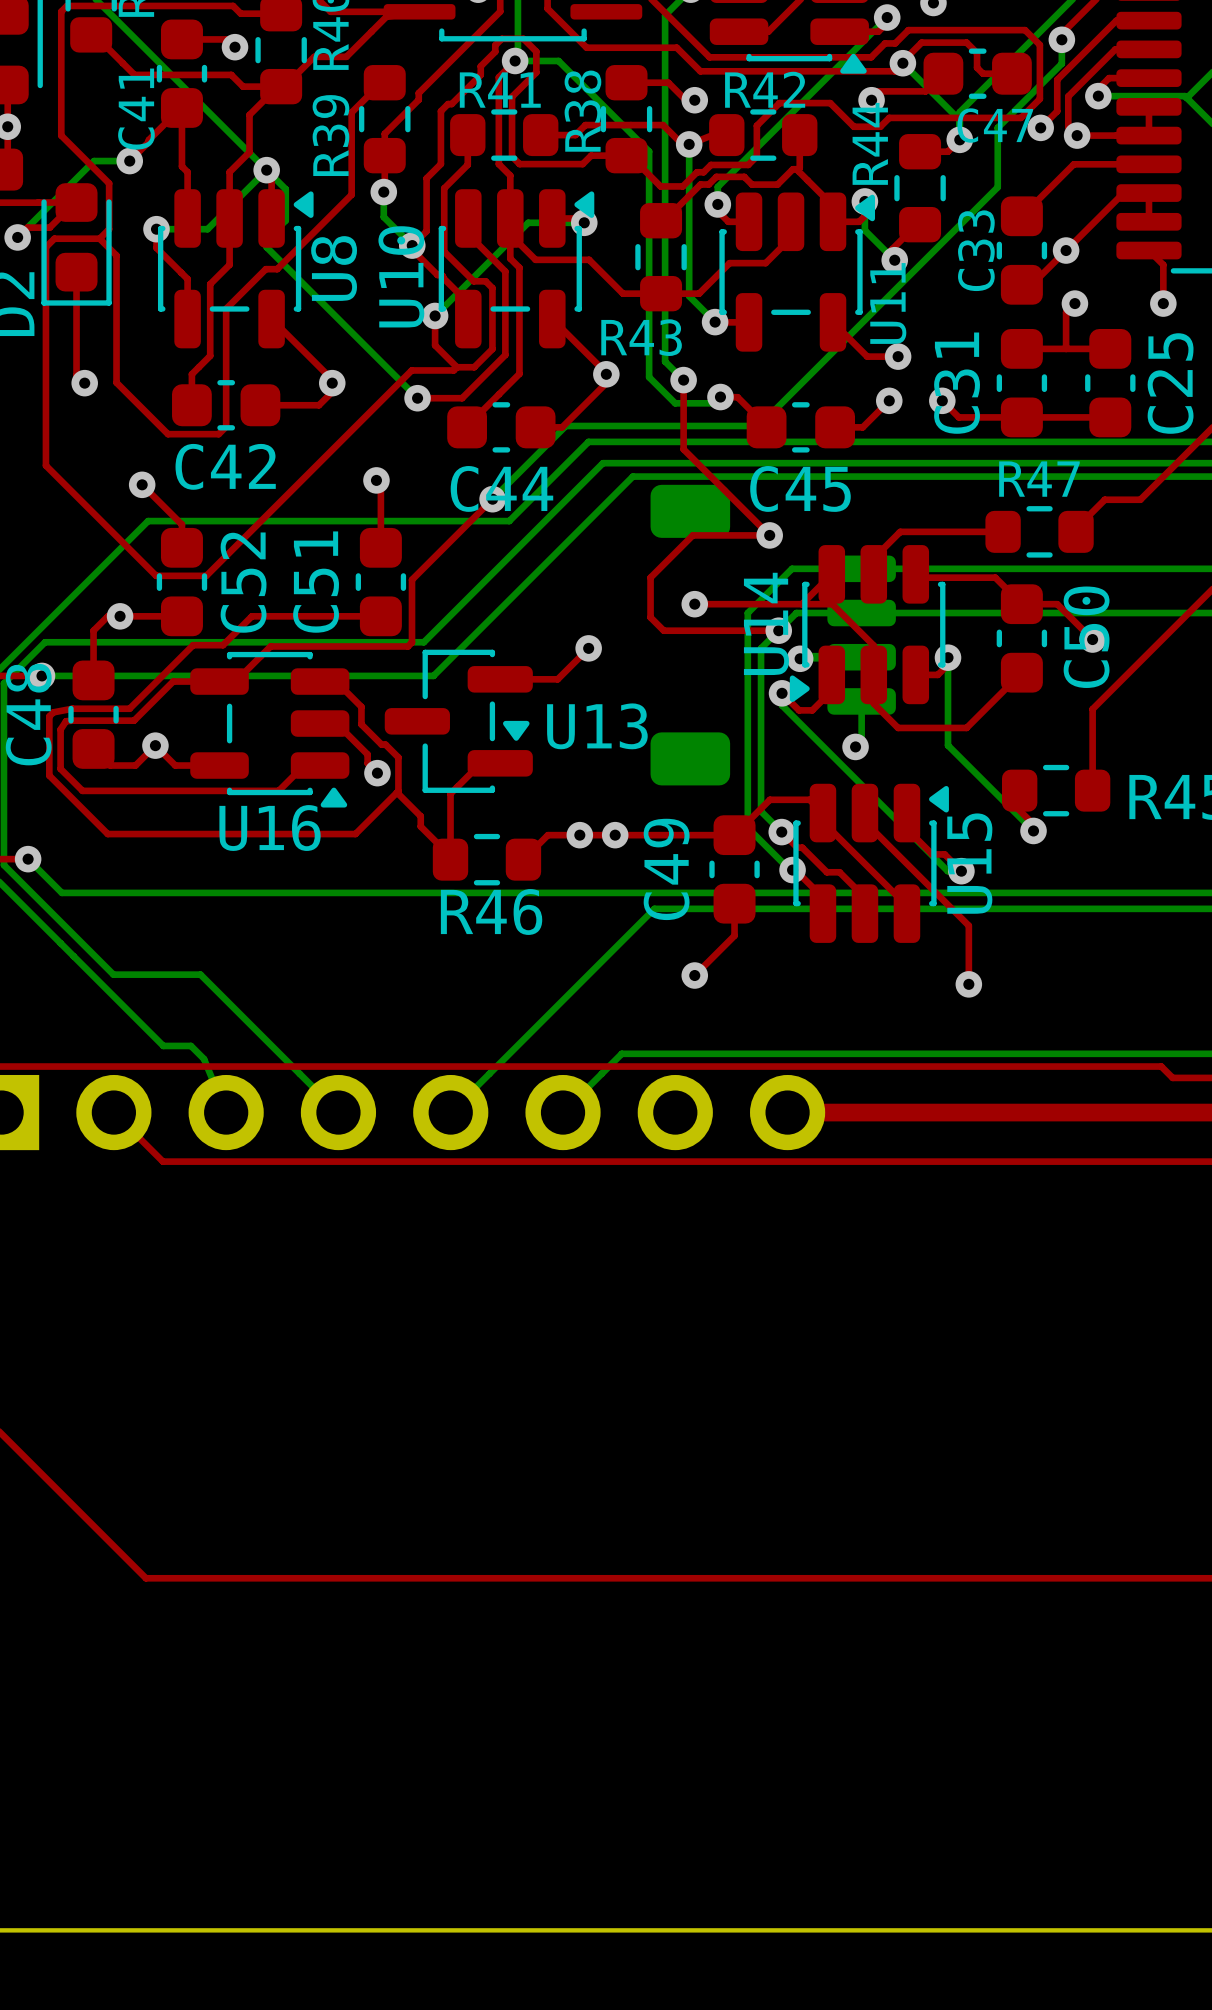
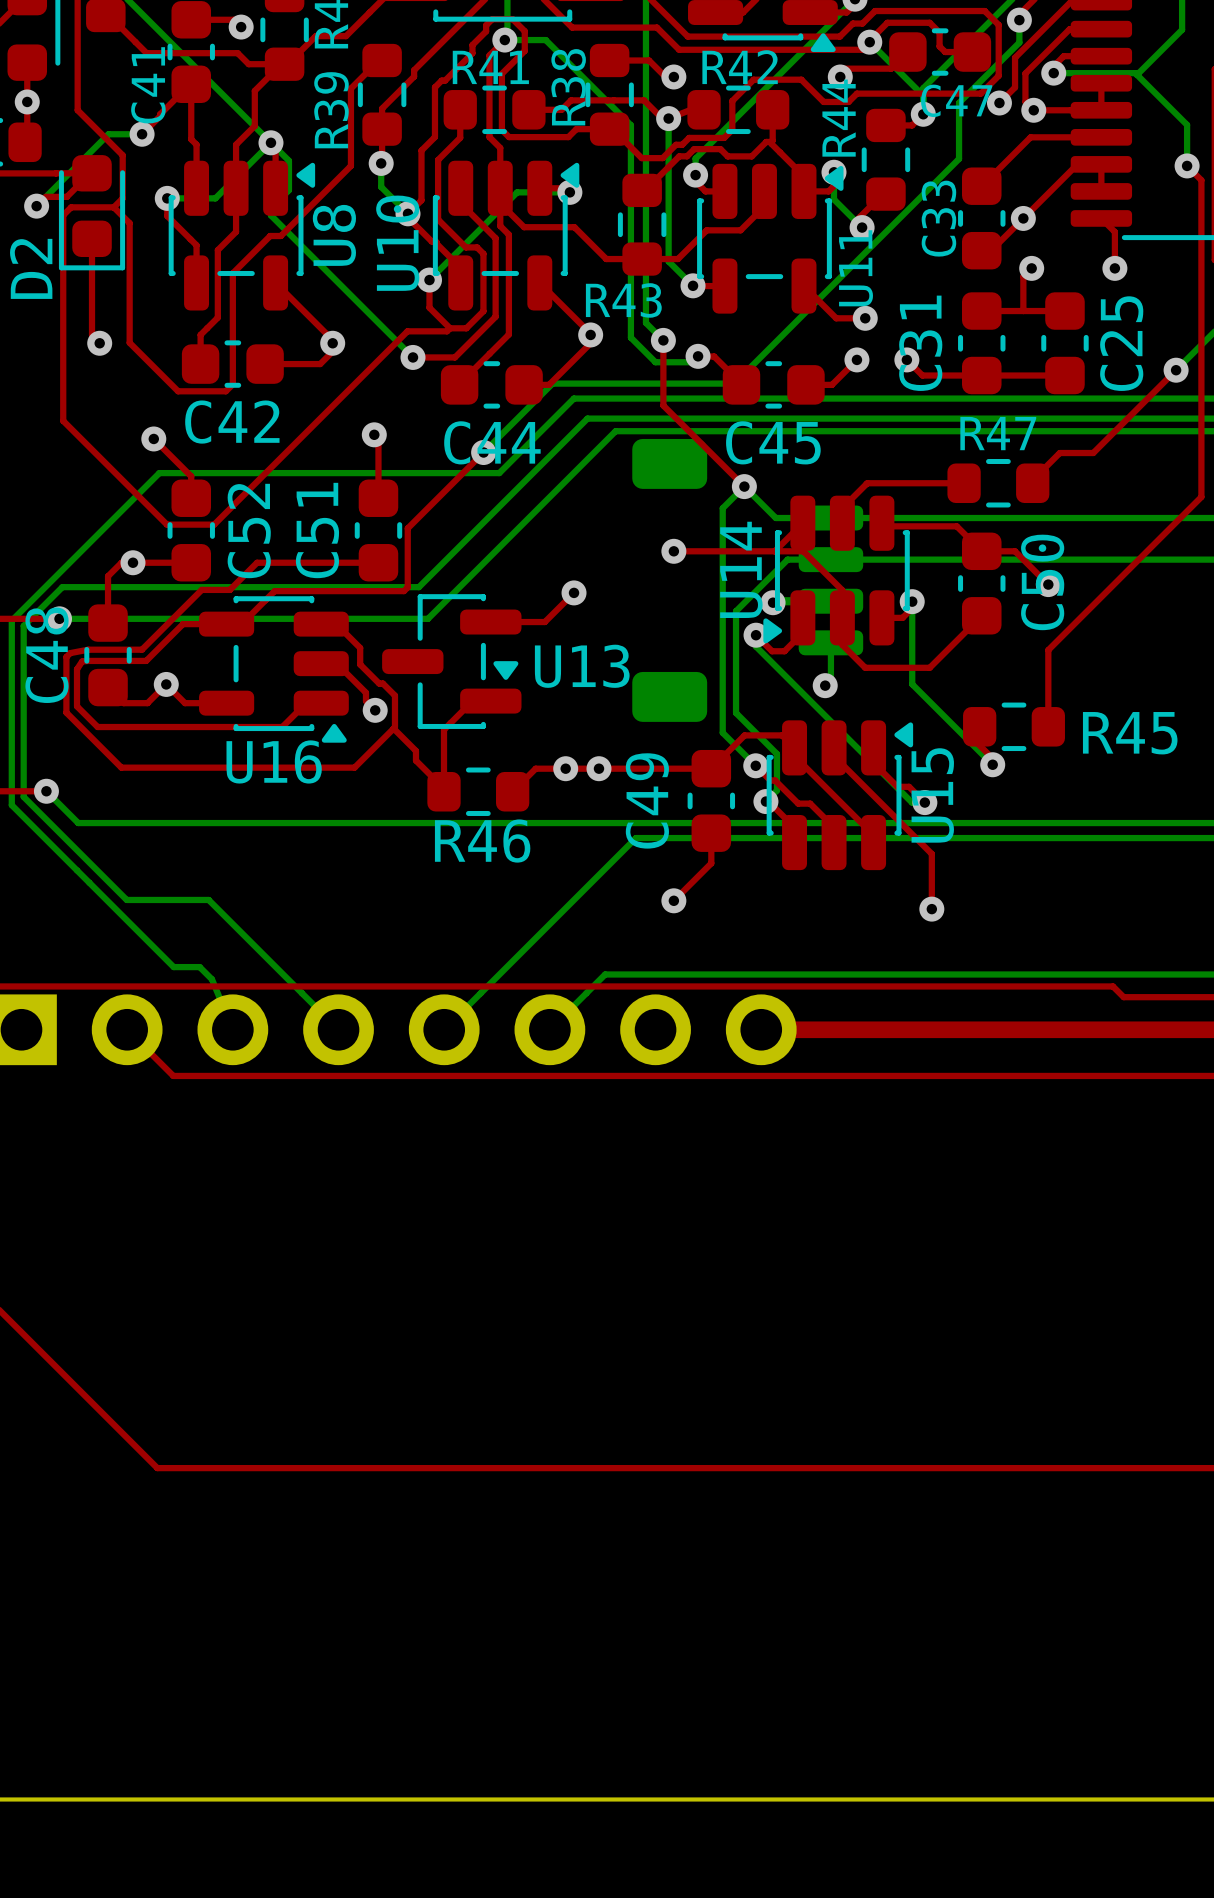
top track: (769, 535) (692, 535) (650, 577) (650, 617) (663, 630) (778, 630) -> none
bottom track: (803, 568) (792, 568) (747, 613) (747, 827) (790, 870) (792, 870) -> (787, 559) (736, 611) (736, 713) (776, 753) (776, 790) (765, 801)
bottom track: (815, 613) (796, 613) (761, 648) (761, 811) -> (775, 518) (744, 486) (722, 508) (722, 732) (736, 746)
via: (778, 630) -> none

